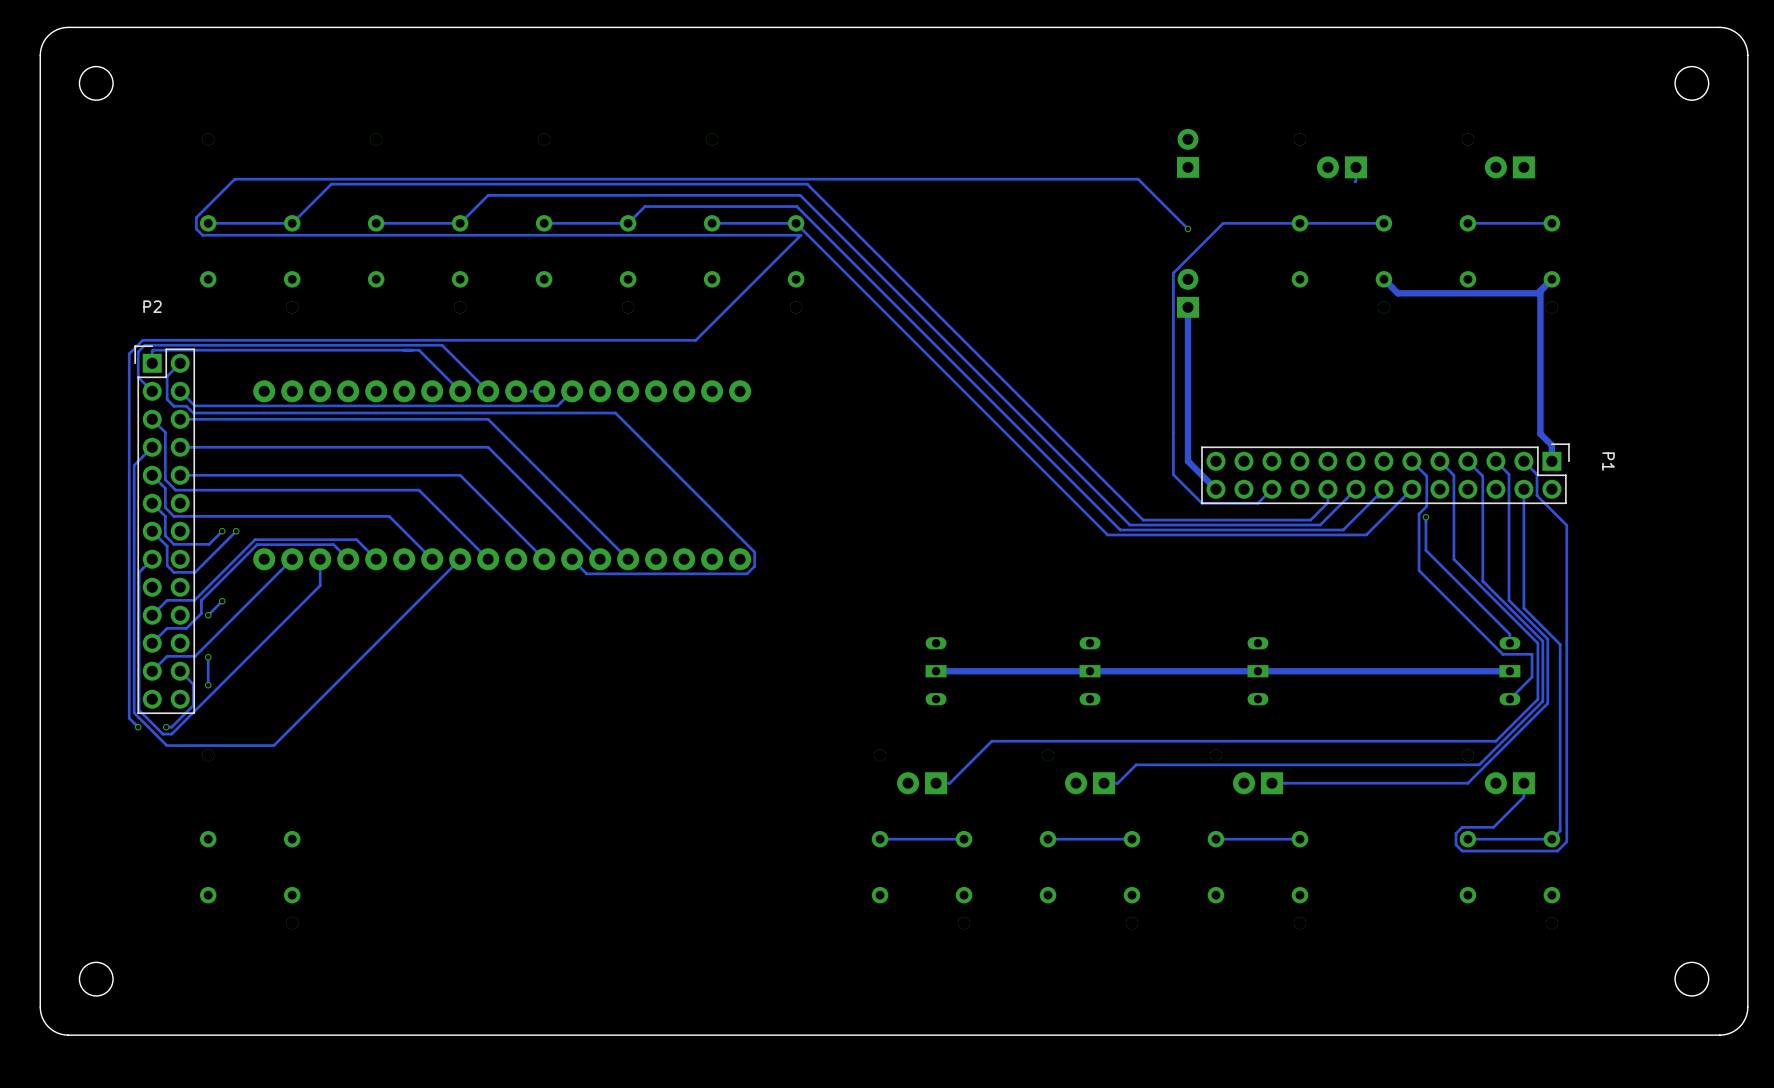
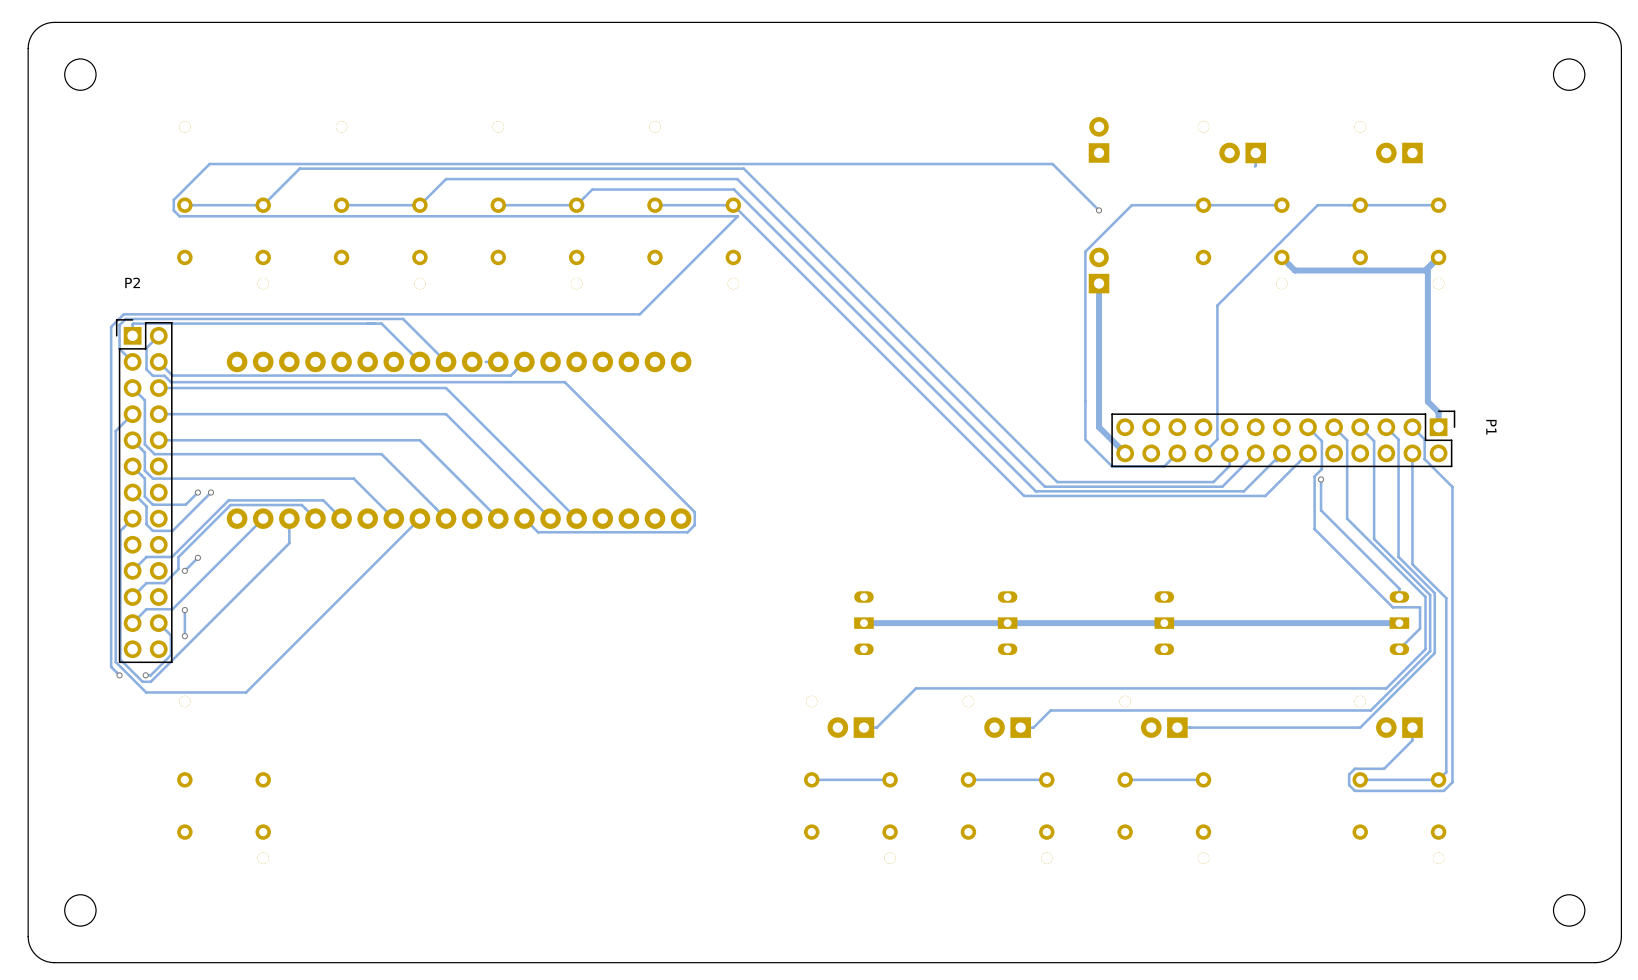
track: none -> (1360, 205) (1317, 205) (1217, 305) (1217, 439) (1203, 453)

